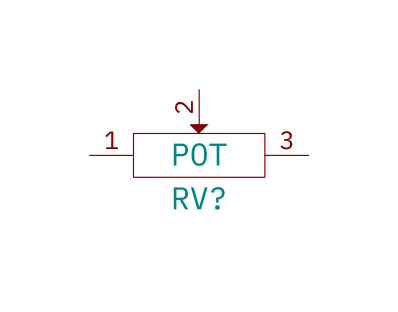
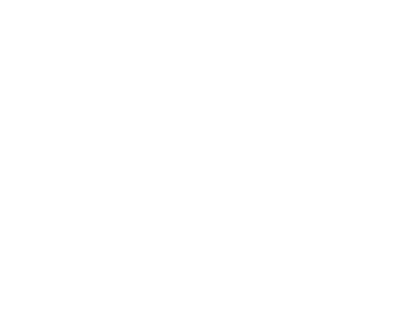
RV?: POT (199, 133) -> none

